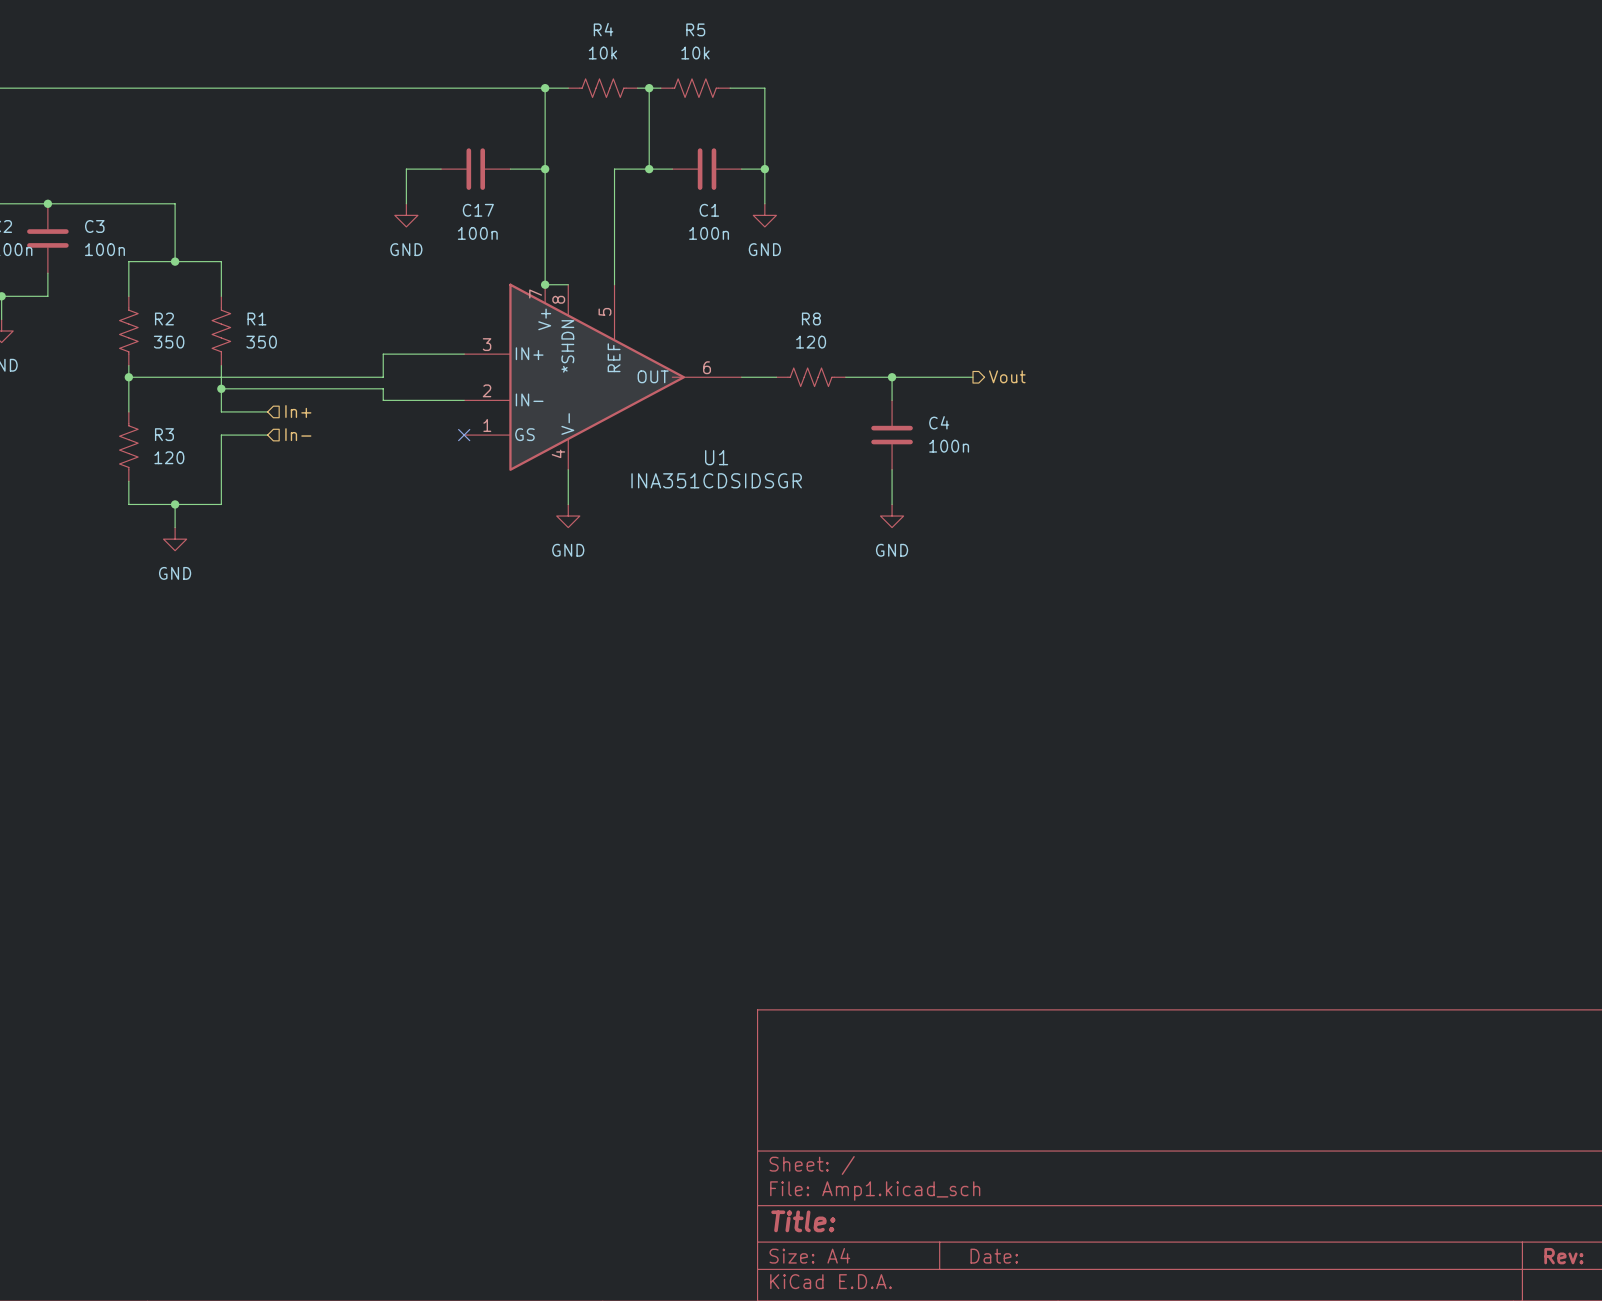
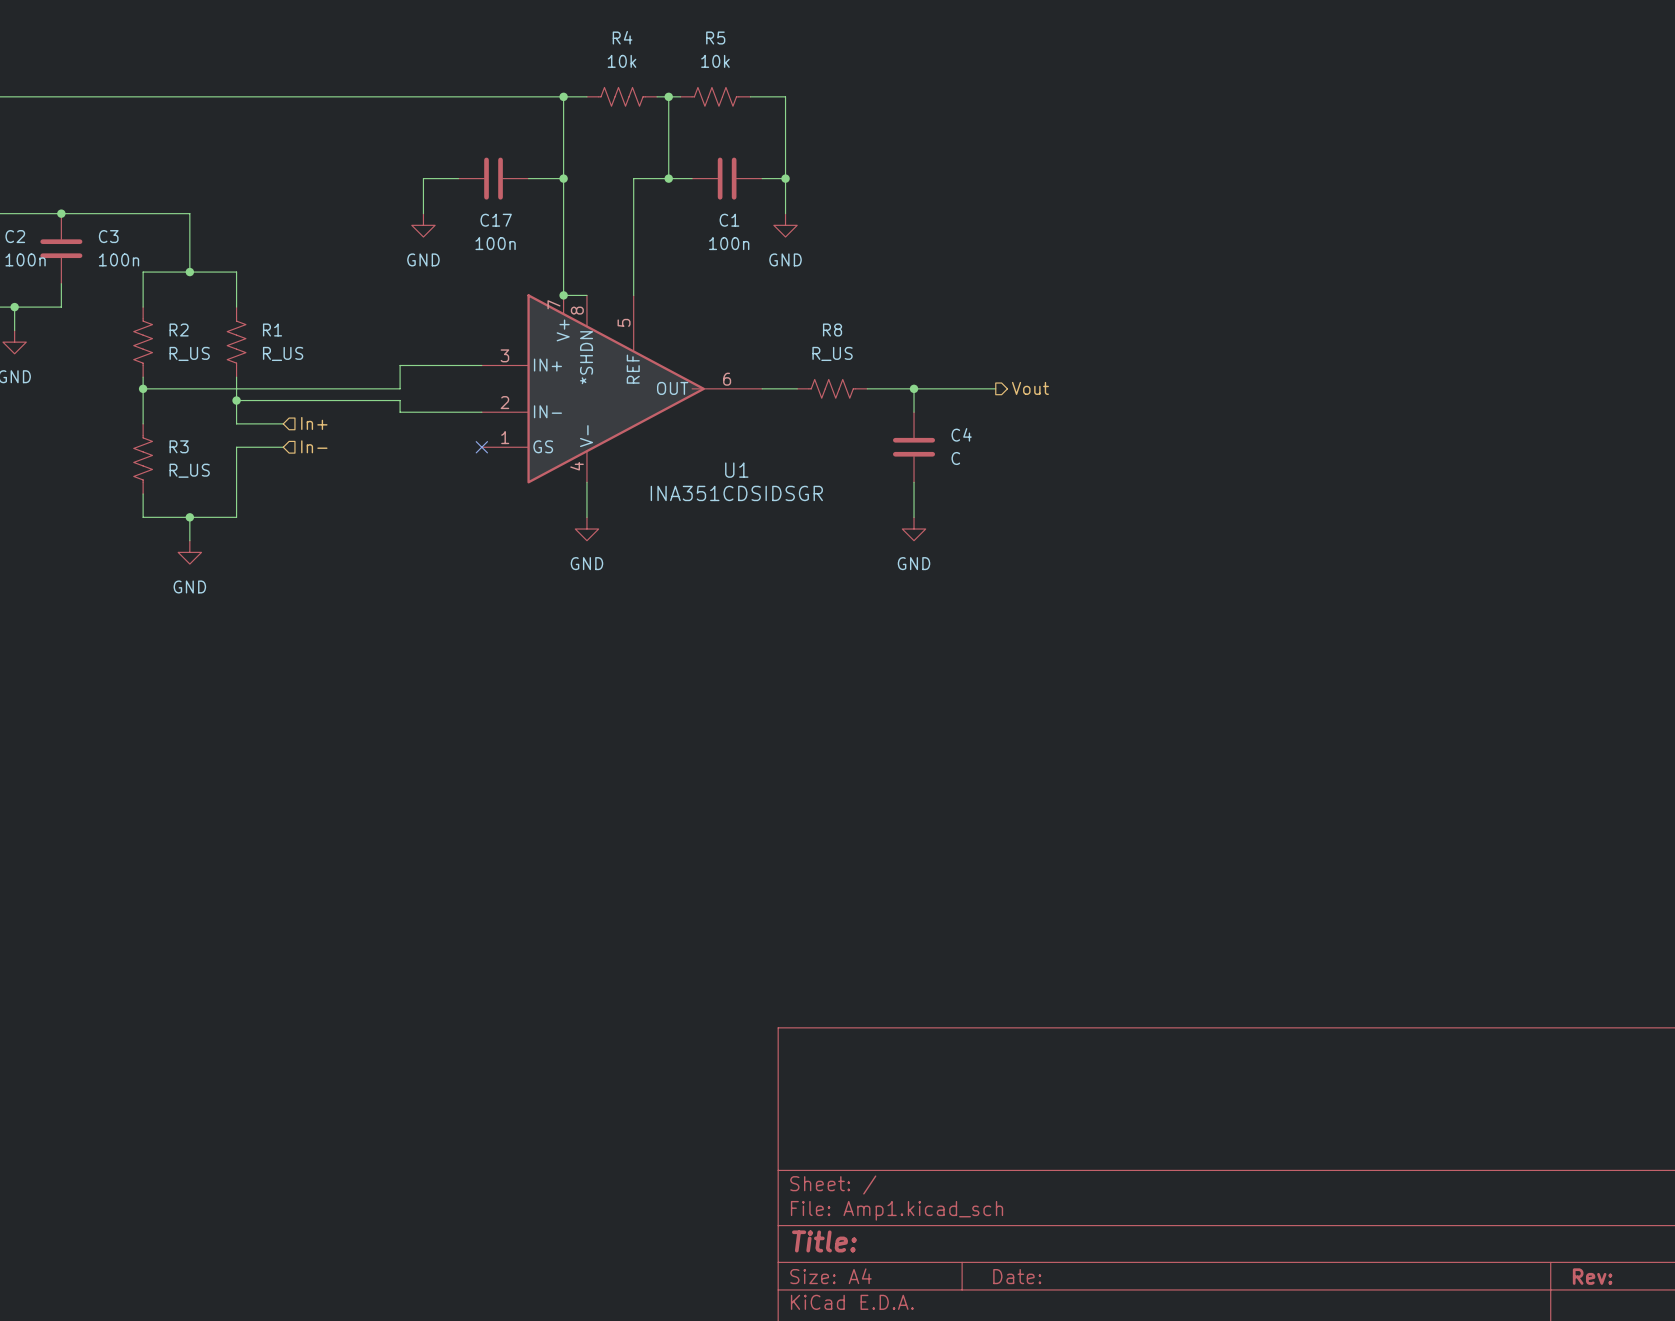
R2 value: 350 (169, 342) -> R_US (189, 353)
R1 value: 350 (261, 342) -> R_US (283, 353)
R8 value: 120 (811, 342) -> R_US (832, 353)
C4 value: 100n (949, 446) -> C (955, 458)
R3 value: 120 (169, 457) -> R_US (189, 470)

